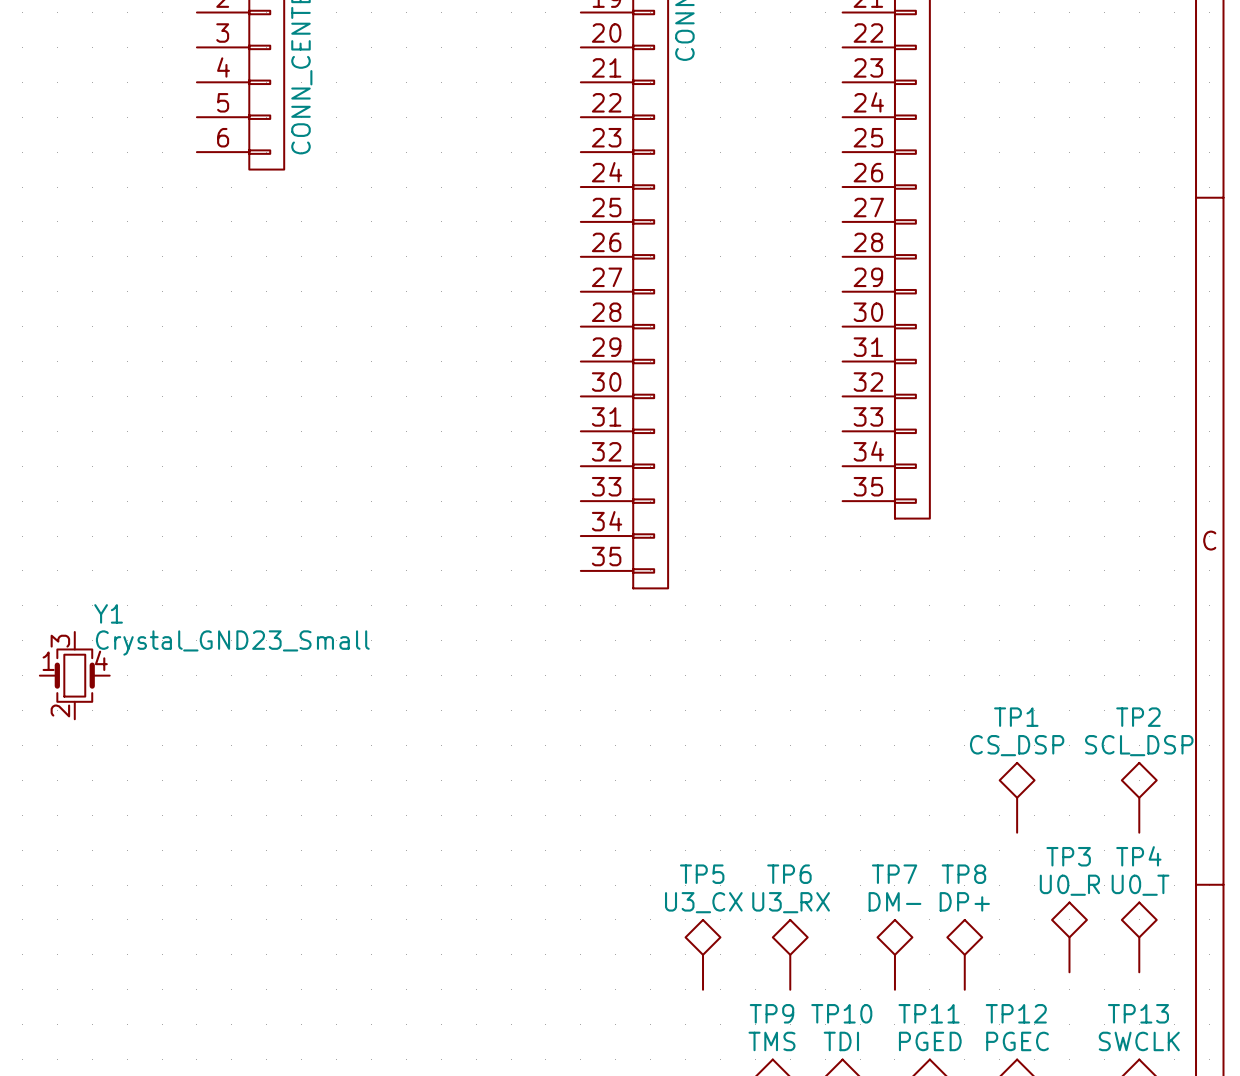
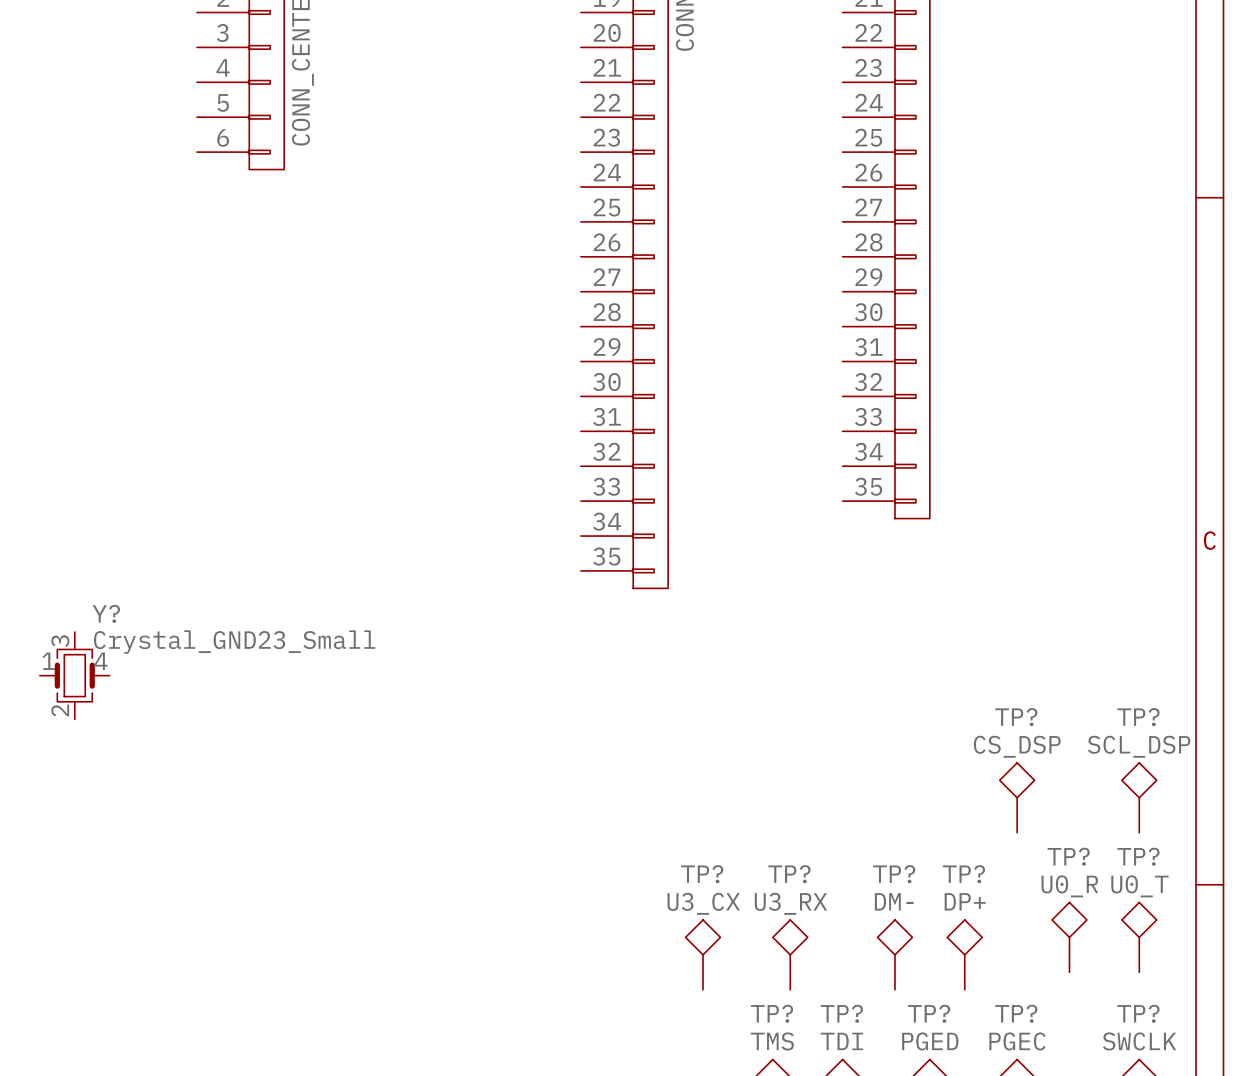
Y1 name: Y1 (108, 613) -> Y? (106, 613)
TP1 name: TP1 (1016, 717) -> TP? (1016, 717)
TP2 name: TP2 (1138, 717) -> TP? (1138, 717)
TP3 name: TP3 (1068, 856) -> TP? (1068, 856)
TP4 name: TP4 (1138, 856) -> TP? (1138, 856)
TP5 name: TP5 (702, 874) -> TP? (702, 874)
TP6 name: TP6 (789, 874) -> TP? (789, 874)
TP7 name: TP7 (894, 874) -> TP? (894, 874)
TP8 name: TP8 (963, 874) -> TP? (963, 874)
TP9 name: TP9 (771, 1013) -> TP? (772, 1013)
TP10 name: TP10 (841, 1013) -> TP? (841, 1013)
TP11 name: TP11 (929, 1013) -> TP? (929, 1013)
TP12 name: TP12 (1016, 1013) -> TP? (1016, 1013)
TP13 name: TP13 (1138, 1013) -> TP? (1138, 1013)

